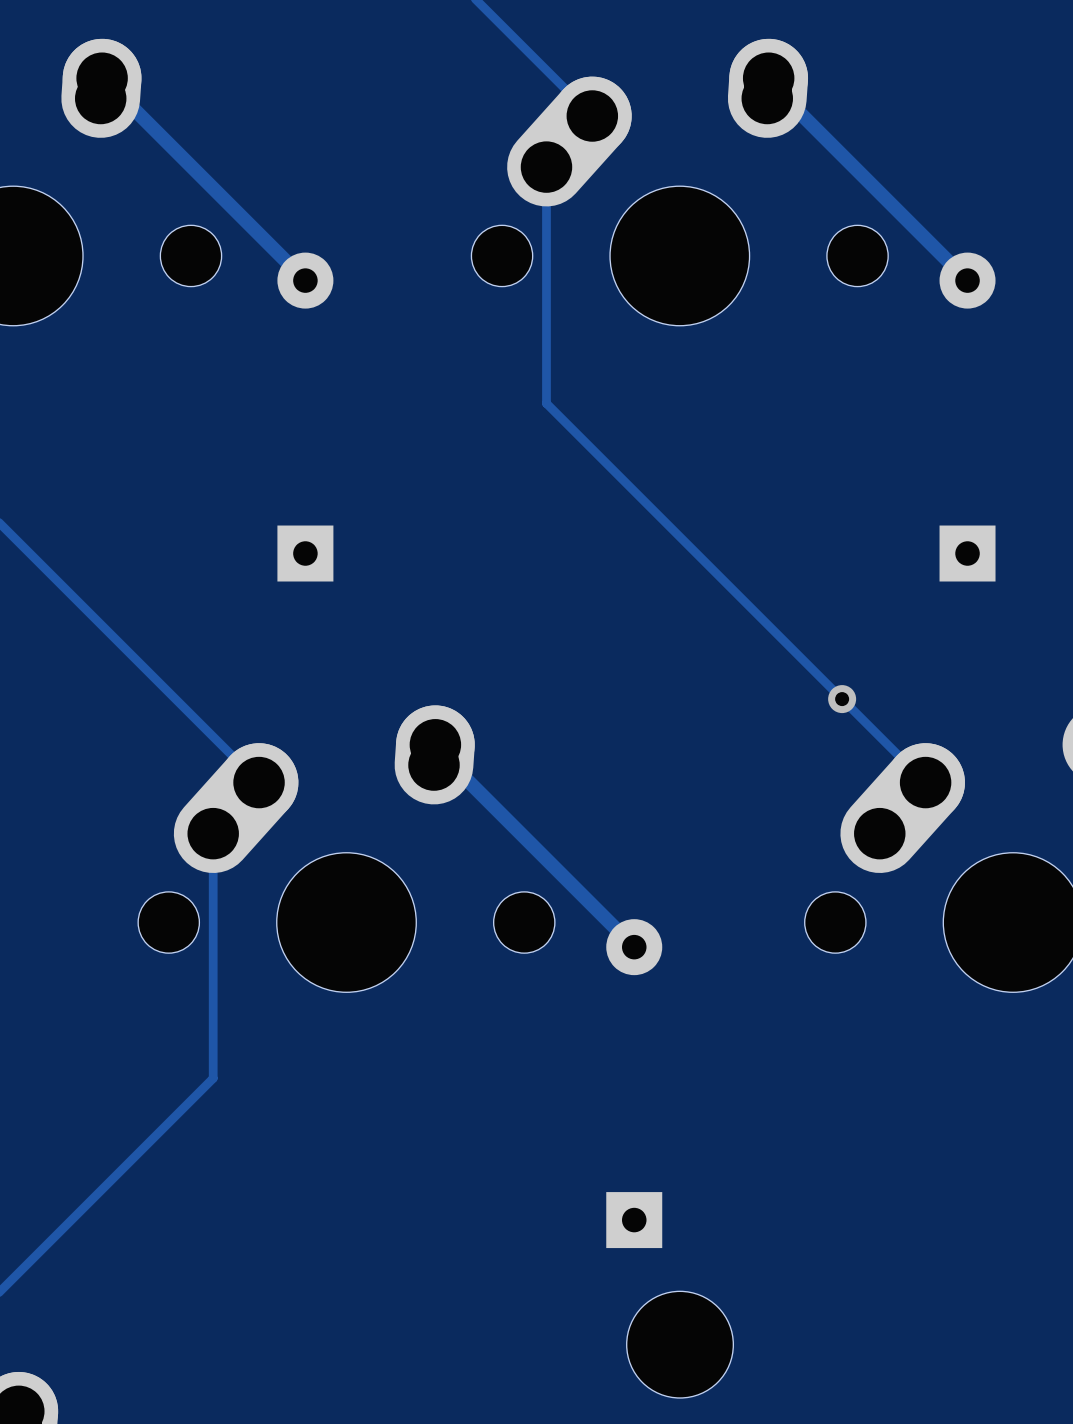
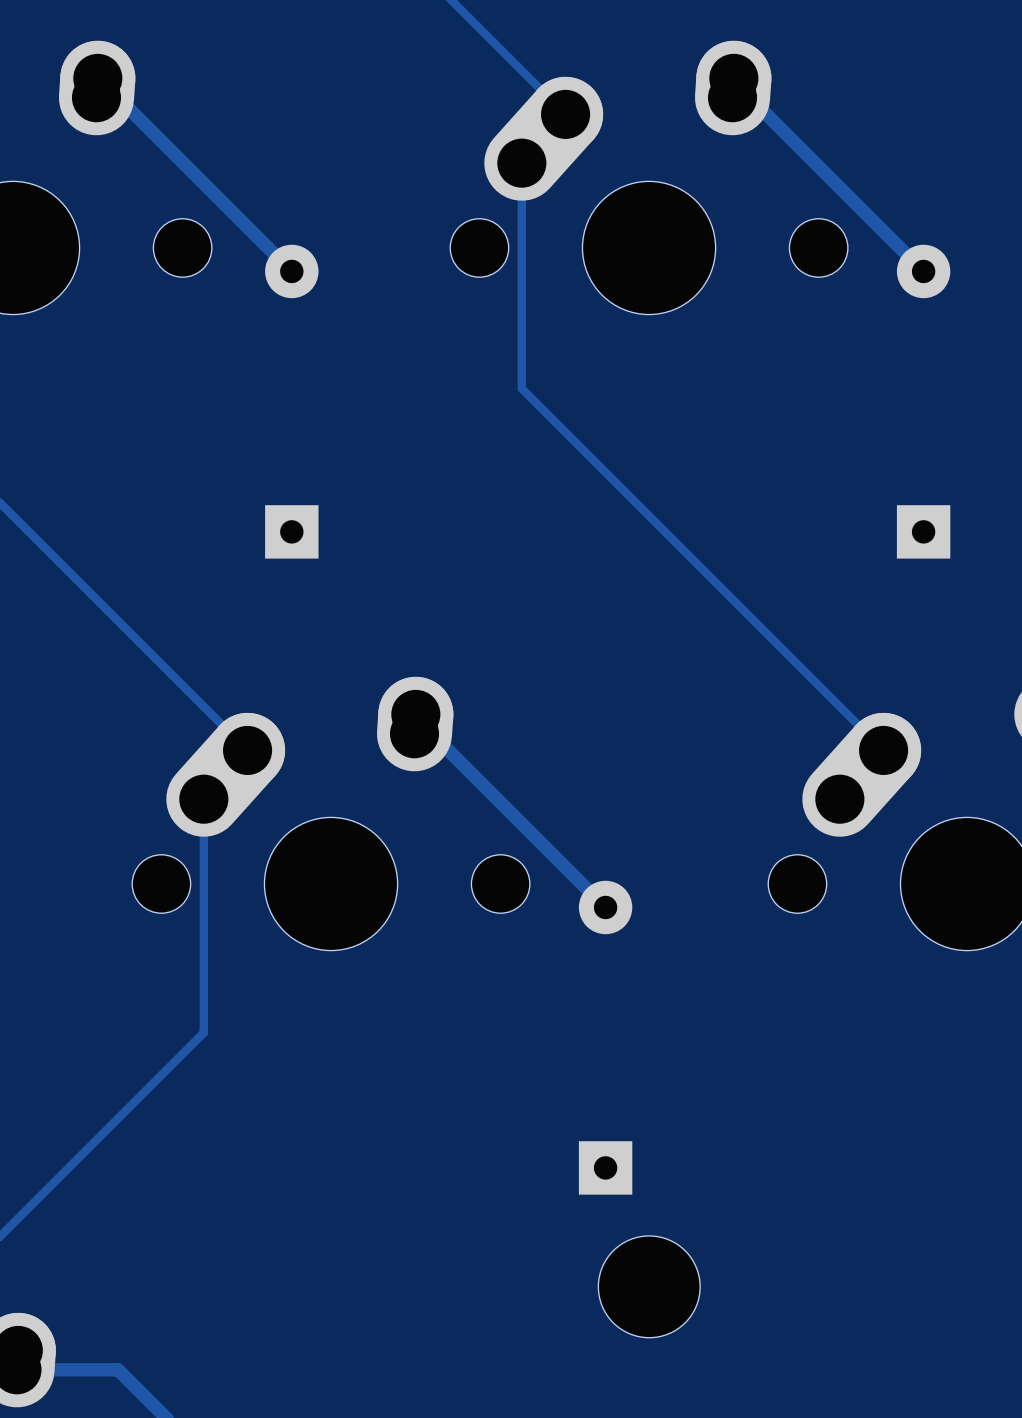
via: (842, 699) -> none

